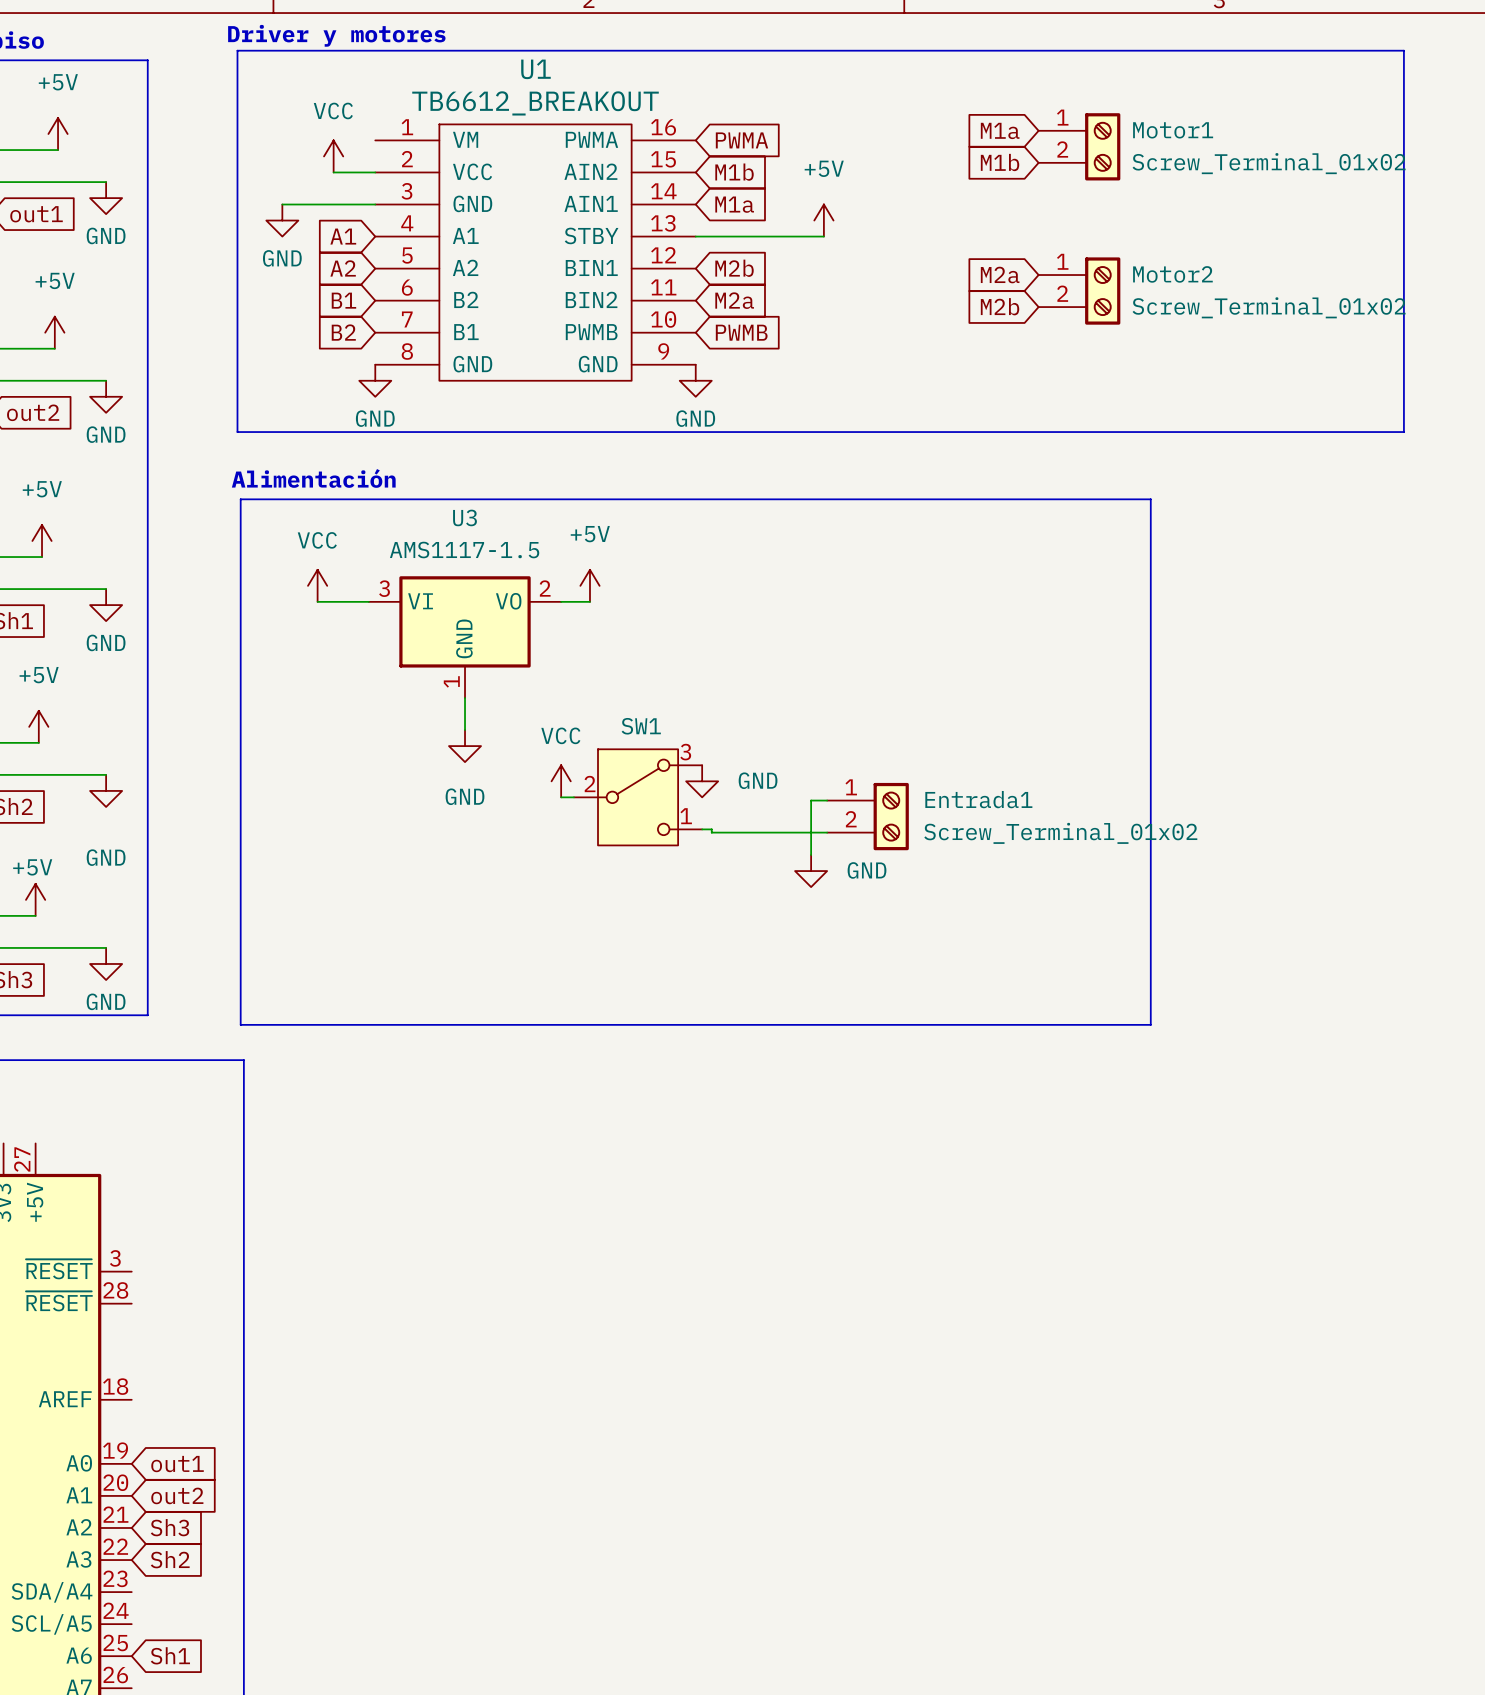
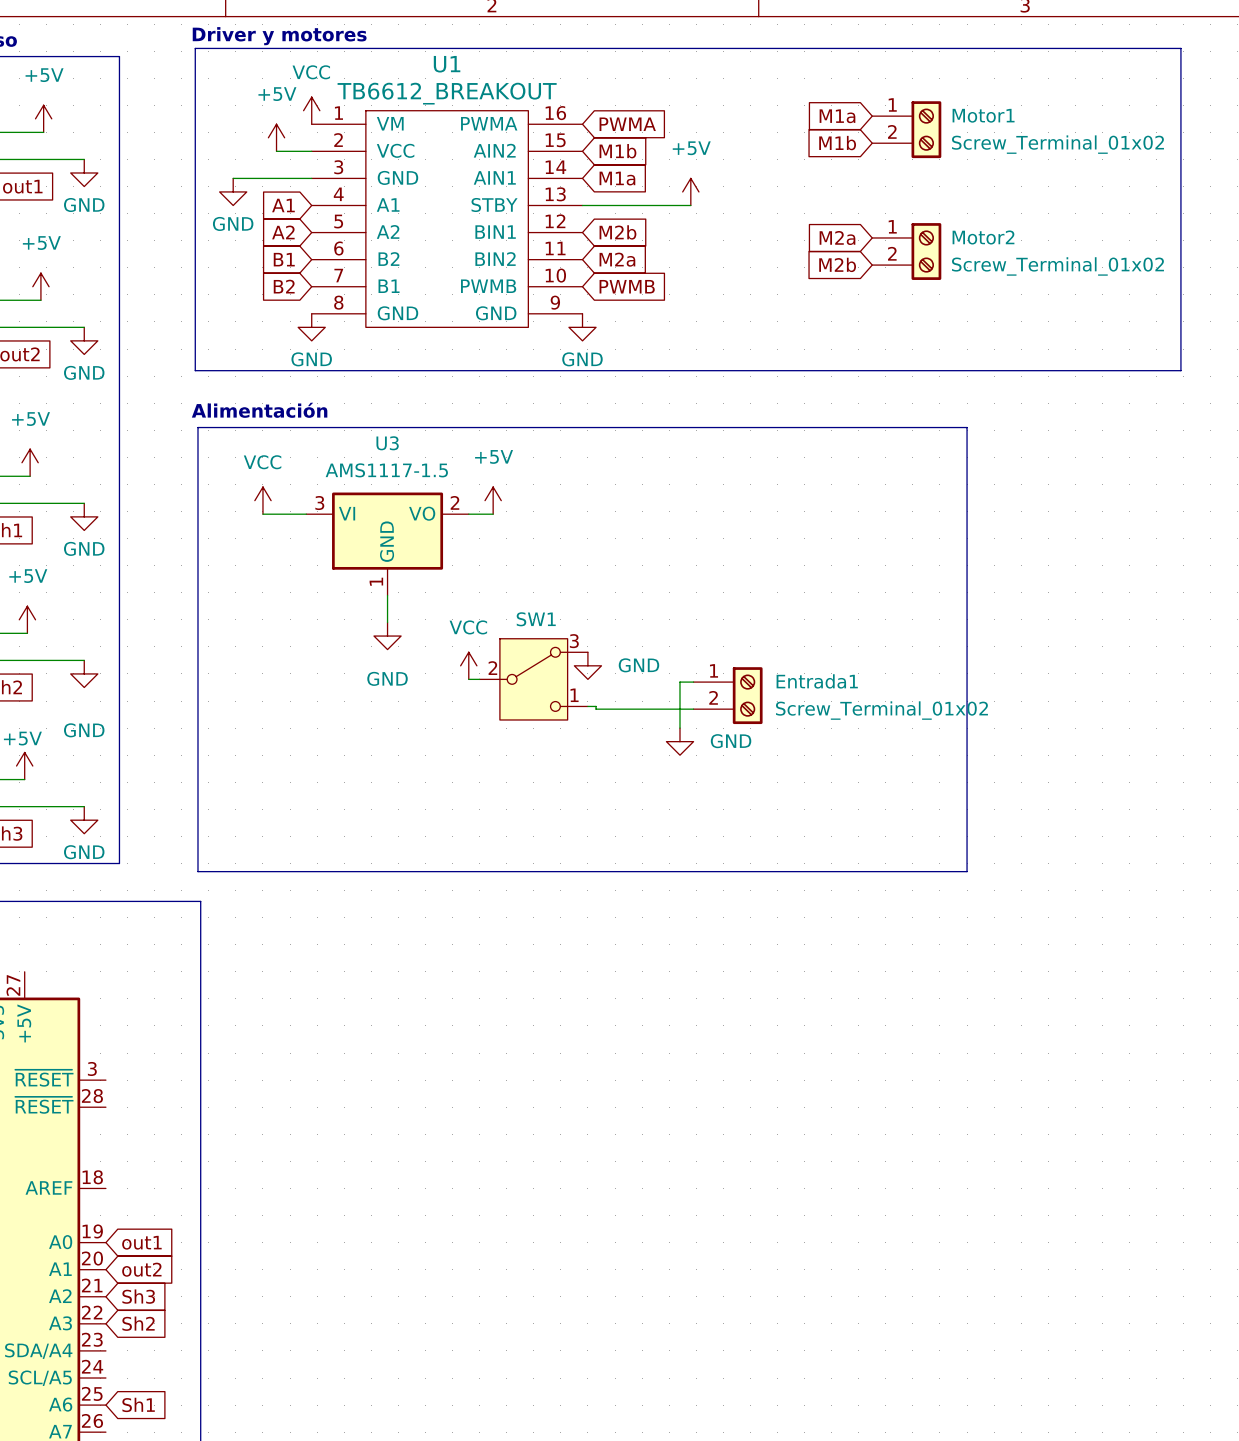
power symbol: none -> VCC (311, 110)
power symbol: VCC (333, 156) -> +5V (276, 137)

